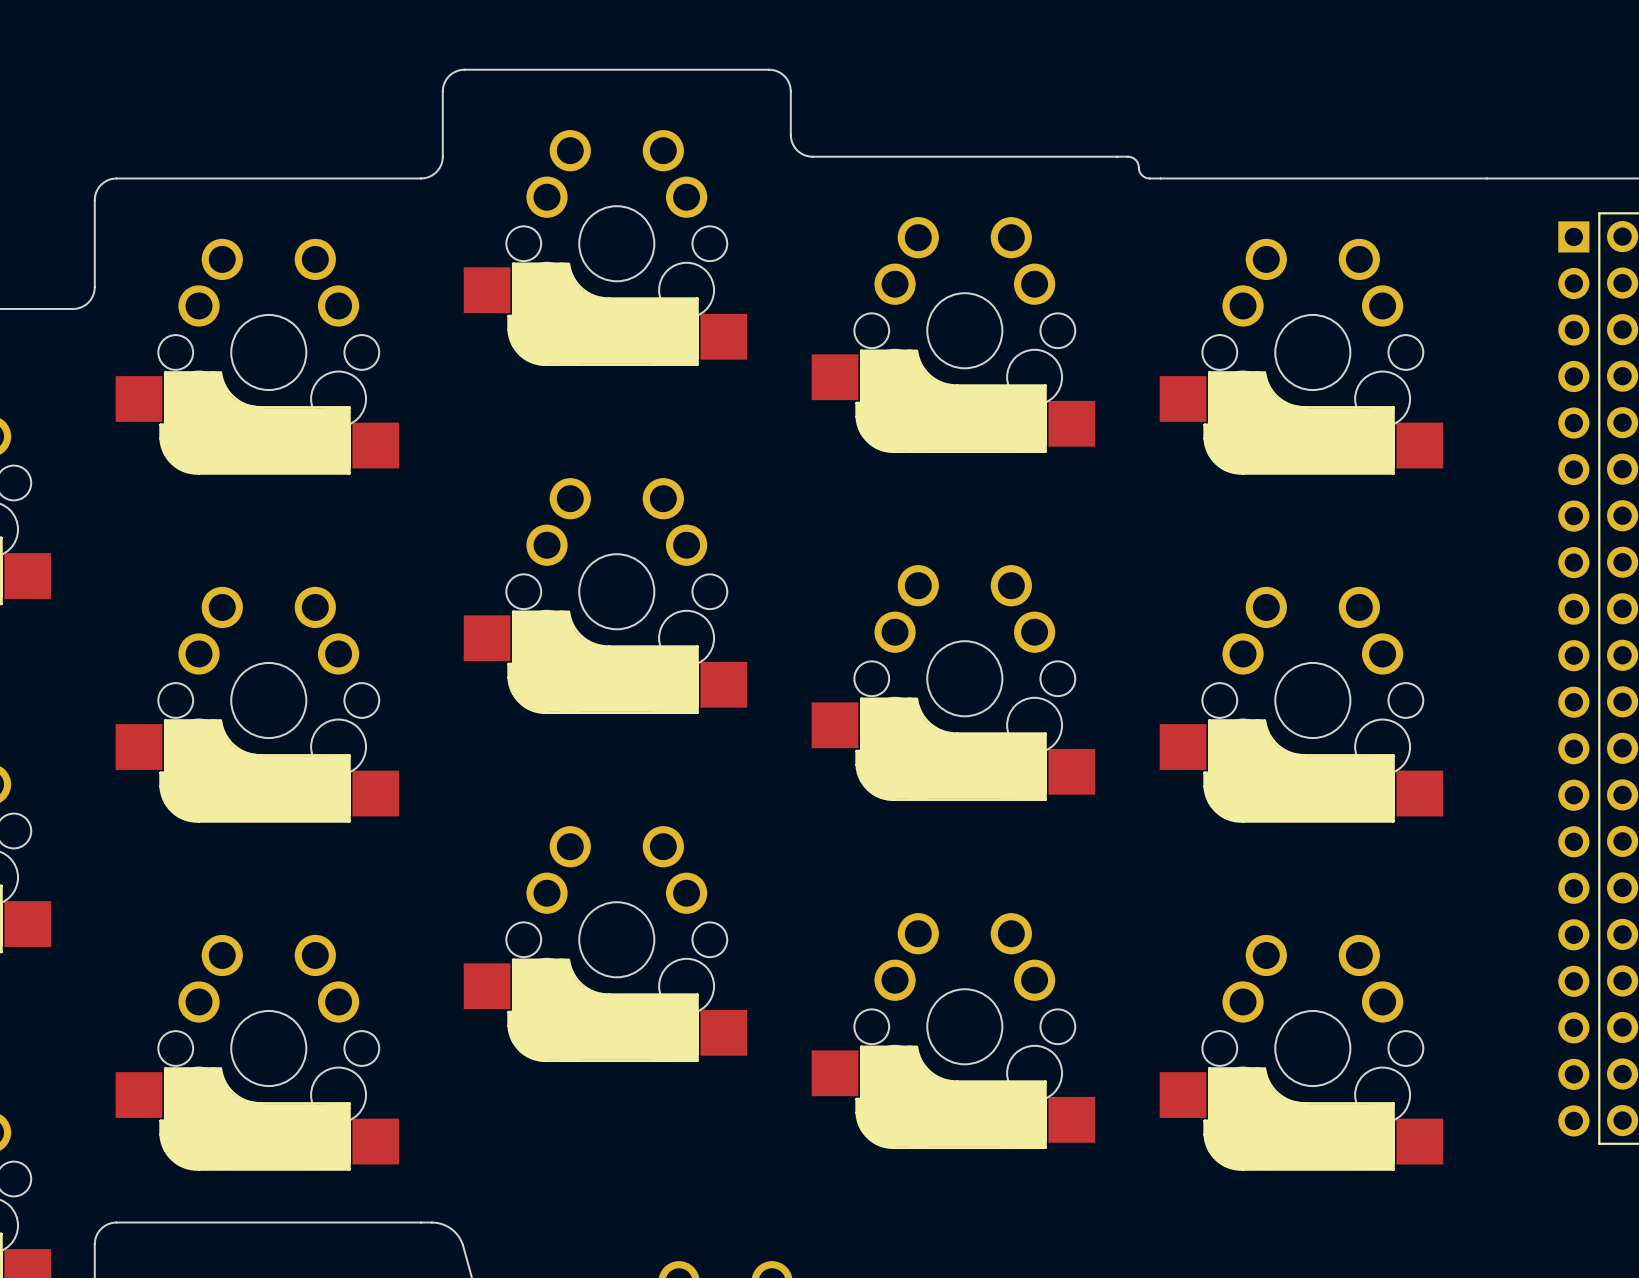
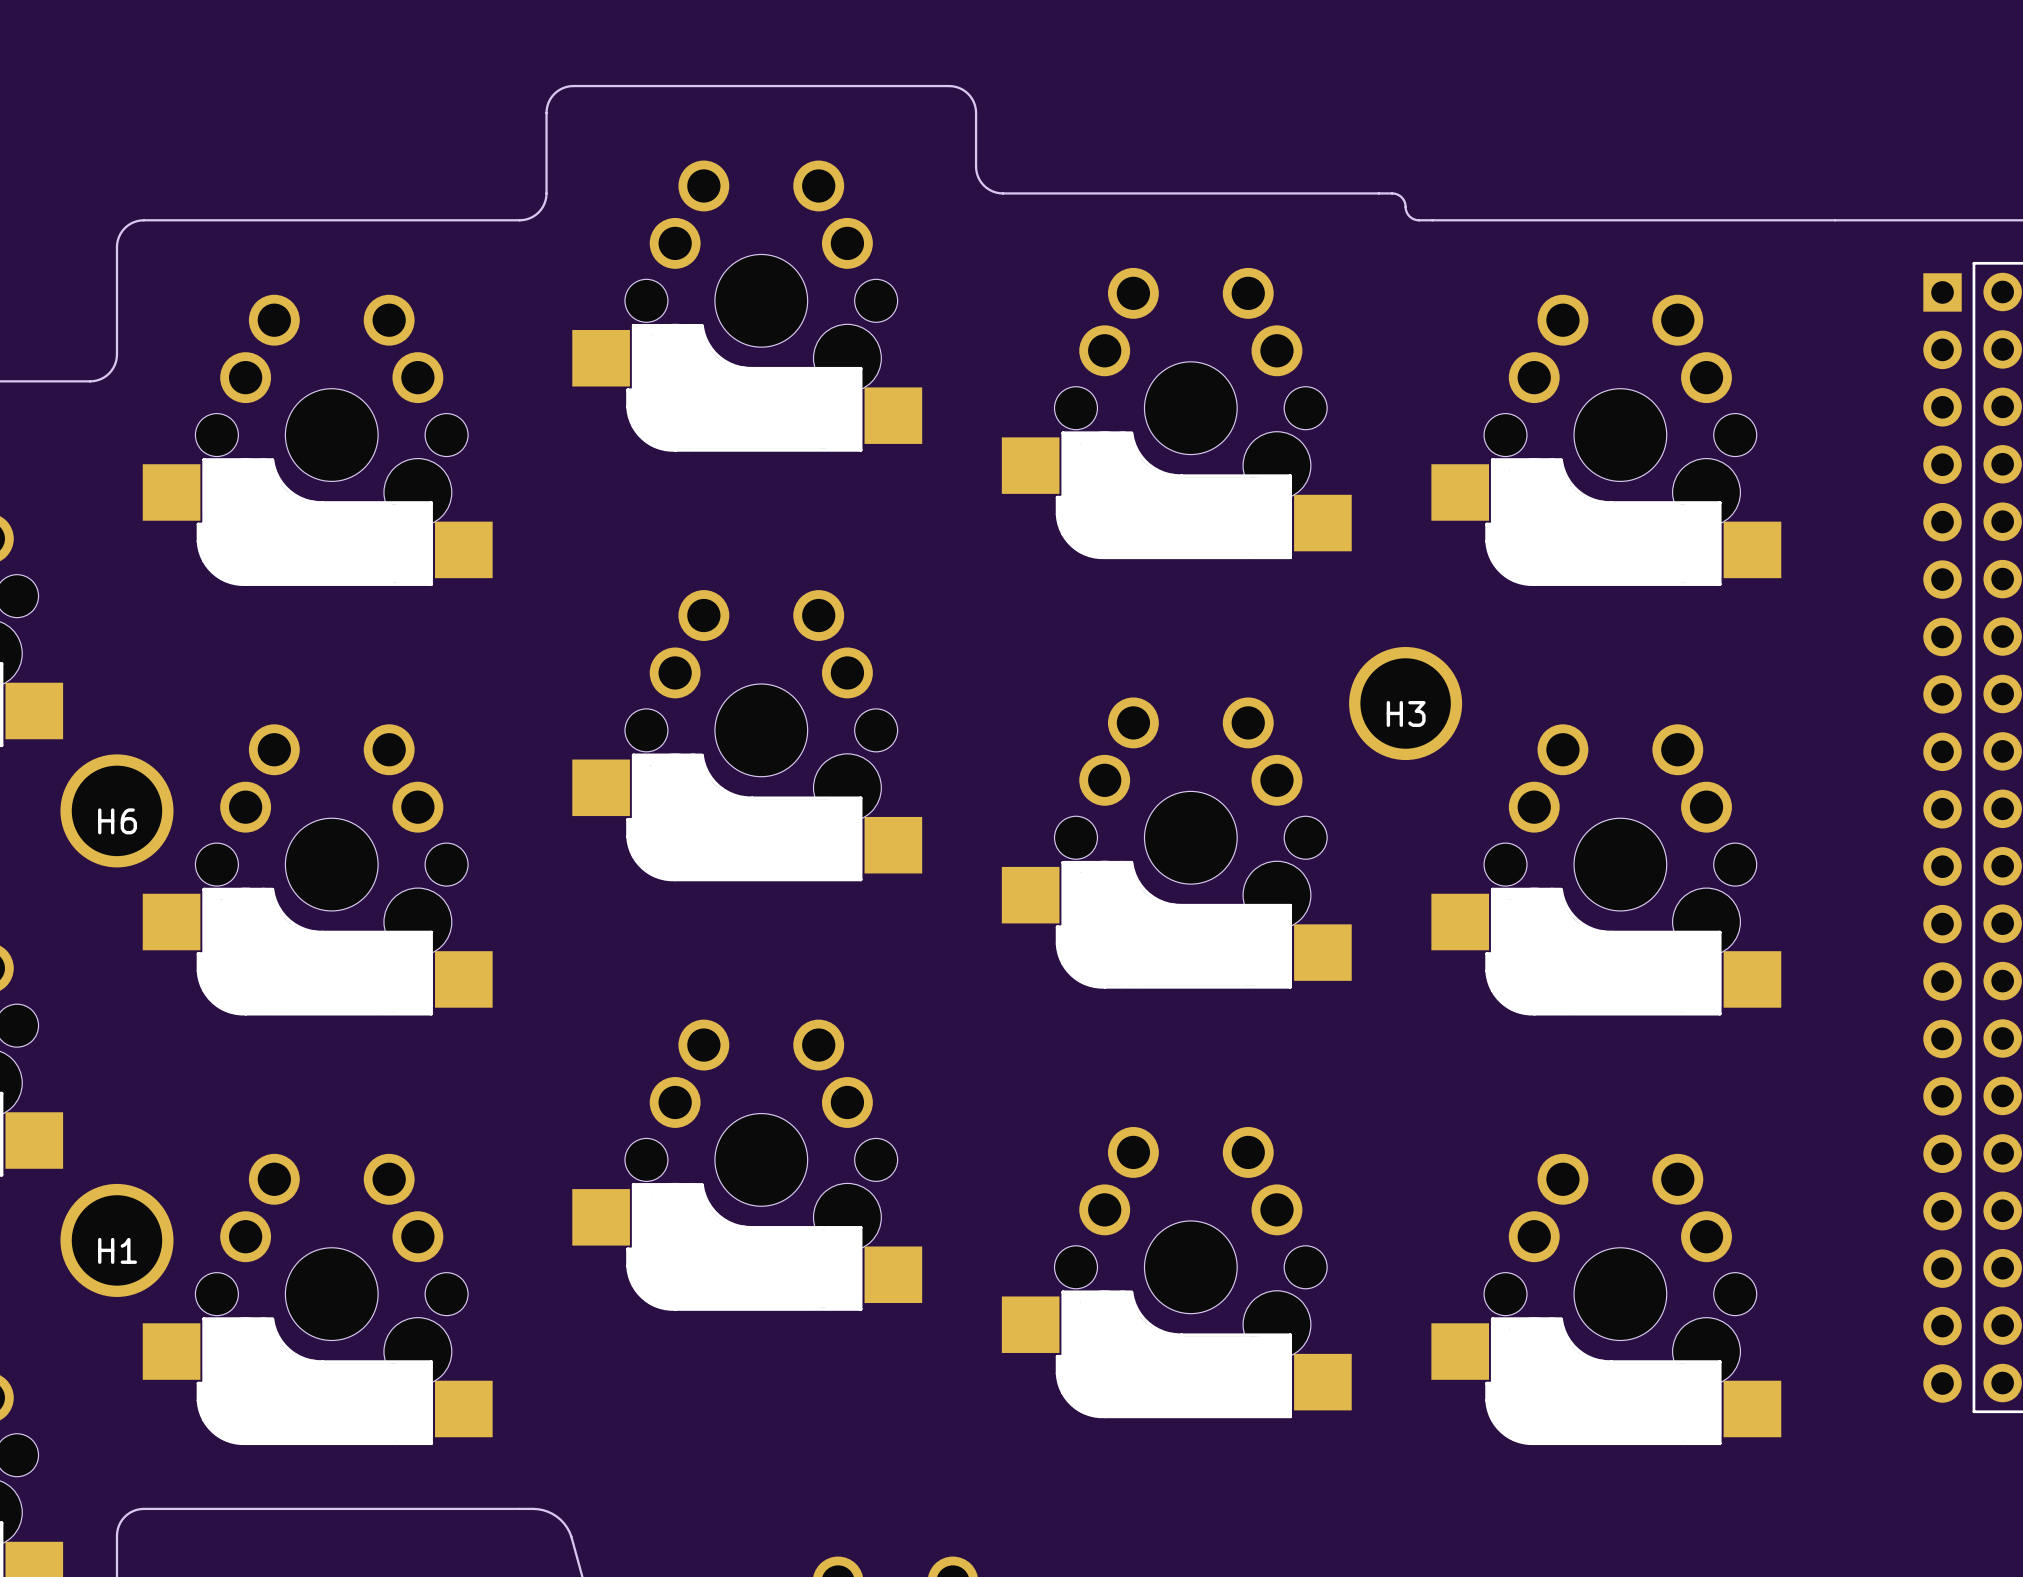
H3: none -> (1405, 703)
H6: none -> (116, 810)
H1: none -> (116, 1240)

